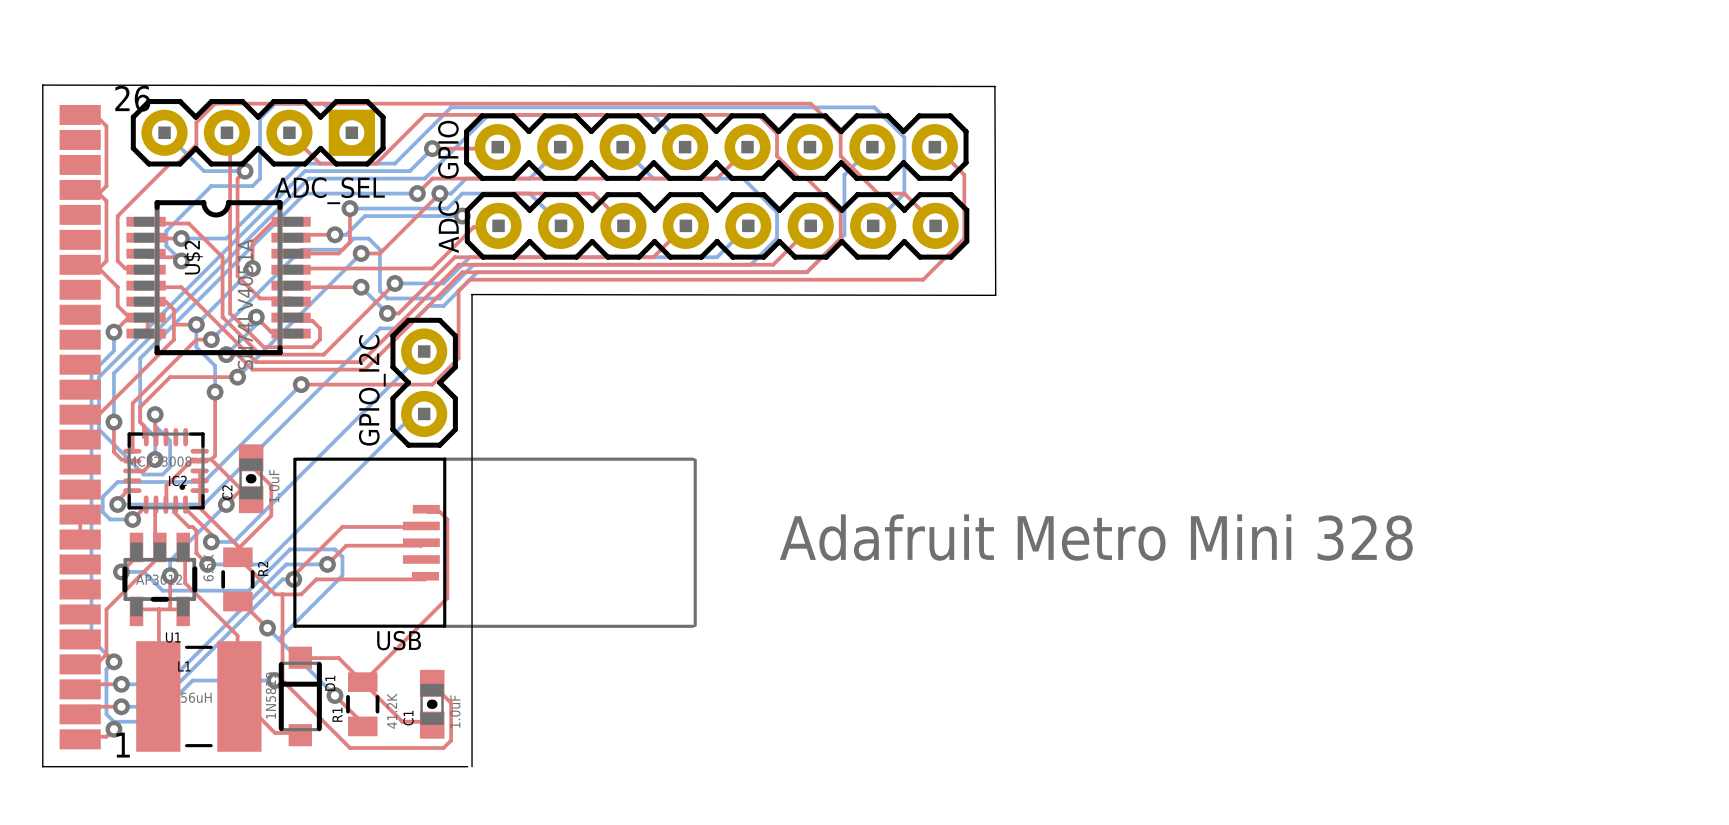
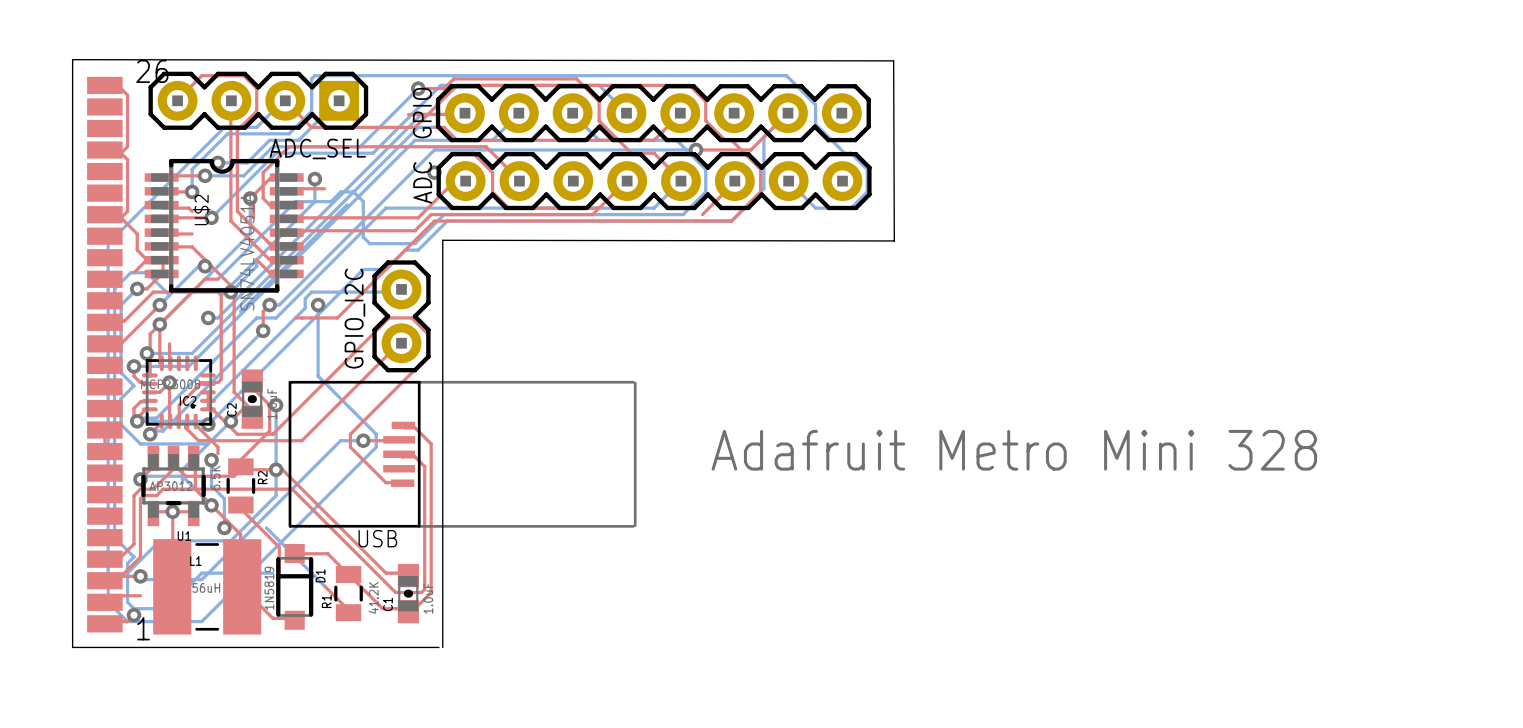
top track: (215, 103) (196, 122) (196, 144) (177, 163) (170, 163) (117, 216) (117, 260) (125, 268) (146, 269) -> (221, 75) (201, 75) (177, 100)
top track: (241, 103) (810, 103) (840, 133) (840, 156) (878, 193) (904, 193) (935, 225) -> none
bottom track: (874, 107) (451, 107) (394, 163) (301, 163) -> (789, 78) (786, 75) (314, 75) (311, 78) (311, 111) (295, 127)
top track: (488, 114) (424, 114) (376, 163) -> (457, 85) (415, 127) (360, 127)
bottom track: (488, 114) (424, 178) (308, 178) (113, 373) (113, 422) -> none
top track: none -> (418, 88) (444, 88) (453, 78) (576, 78) (599, 101) (599, 120) (631, 153) (654, 153) (680, 181)
bottom track: none -> (418, 88) (360, 146) (272, 146) (243, 175) (205, 175)
bottom track: (164, 132) (203, 171) (222, 171) -> (192, 188) (192, 169) (227, 133)
top track: (226, 132) (230, 133) (230, 313) (263, 347) (312, 347) (319, 339) (319, 328) (312, 320) (293, 320) (291, 317) -> (231, 100) (230, 221) (269, 259) (286, 260)
bottom track: none -> (285, 100) (256, 127) (224, 127) (108, 243) (108, 602) (127, 621) (201, 621) (376, 447) (376, 434) (318, 376) (318, 305)
bottom track: (351, 132) (323, 103) (275, 103) (260, 118) (260, 178) (252, 186) (211, 186) (166, 231) (166, 246) (181, 260) -> (339, 100) (298, 140) (269, 140) (247, 162) (217, 162)
bottom track: none -> (464, 113) (421, 114) (217, 317) (208, 317)
top track: none -> (787, 113) (750, 149) (696, 149)
top track: (934, 147) (964, 174) (964, 238) (923, 279) (469, 279) (458, 290) (458, 358) (432, 384) -> (402, 483) (385, 482) (350, 447) (350, 434) (427, 356) (427, 334) (411, 317) (408, 317)
bottom track: (432, 148) (409, 171) (305, 171) (98, 377) -> (137, 288) (121, 305) (121, 311)
via position: (432, 148) -> (418, 88)
bottom track: (904, 159) (904, 193) (873, 225) -> (815, 124) (844, 153) (851, 153) (867, 169) (867, 191) (851, 208) (815, 208) (788, 181)
bottom track: none -> (434, 127) (418, 127) (192, 353) (146, 353)
top track: (245, 171) (237, 178) (237, 275) (260, 298) (271, 298) -> (243, 75) (256, 88) (256, 111) (237, 130) (237, 211) (269, 243)
via: (245, 171) -> none
bottom track: (293, 171) (226, 238) (181, 238) -> (289, 133) (247, 133)
bottom track: (466, 178) (451, 193) (439, 193) -> (437, 140) (415, 140) (188, 366) (133, 366)
top track: (488, 178) (432, 178) (417, 193) -> (457, 140) (444, 127) (434, 127)
bottom track: none -> (696, 149) (434, 149) (279, 305) (269, 305)
via: none -> (696, 149)
bottom track: (305, 193) (140, 358) (140, 422) (155, 437) (155, 459) -> (298, 153) (276, 153) (211, 217)
bottom track: (391, 193) (417, 193) -> (373, 153) (440, 85) (457, 85)
via: (417, 193) -> none
top track: (439, 193) (379, 253) (361, 253) -> none
via: (439, 193) -> none
top track: (507, 193) (593, 193) (623, 223) (623, 225) -> (473, 153) (492, 172) (492, 191) (508, 208)
via: none -> (217, 162)
top track: (349, 208) (349, 242) (338, 253) (291, 253) -> (519, 181) (486, 146) (289, 146) (263, 172) (263, 198) (269, 204) (286, 205)
bottom track: (349, 208) (447, 208) (462, 193) (529, 193) (560, 225) -> none
via: (349, 208) -> none
bottom track: (462, 216) (364, 216) (346, 234) (334, 234) -> none
via: none -> (205, 175)
top track: (146, 221) (147, 223) (188, 223) (222, 257) (222, 317) (260, 354) (323, 354) (394, 283) -> (161, 177) (163, 175) (205, 175)
bottom track: none -> (314, 179) (314, 201) (221, 295)
top track: (484, 227) (473, 227) (432, 268) -> (453, 182) (427, 208)
via position: (334, 234) -> (314, 179)
bottom track: none -> (250, 198) (250, 233) (159, 324)
via: (361, 253) -> none
top track: (454, 257) (548, 257) -> none
bottom track: (469, 257) (443, 283) (394, 283) -> (440, 208) (385, 208) (276, 317) (256, 317) (156, 418) (133, 418)
via: (181, 260) -> none
top track: (645, 264) (773, 264) -> (592, 214) (599, 208)
top track: none -> (211, 217) (161, 218)
via: none -> (211, 217)
bottom track: (252, 268) (196, 324) (196, 347) (215, 365) (215, 392) -> none
via position: (252, 268) -> (250, 198)
top track: (443, 268) (398, 313) (387, 313) -> (418, 217) (408, 217)
via: (394, 283) -> none
top track: (439, 283) (361, 362) (256, 362) (181, 287) -> none
top track: (291, 285) (361, 287) -> (286, 232) (289, 230) (415, 230)
bottom track: (361, 287) (387, 313) -> none
via: (361, 287) -> none
top track: (166, 302) (173, 309) (173, 339) (143, 369) -> none
via: (387, 313) -> none
bottom track: none -> (205, 259) (159, 305)
via: (256, 317) -> none
top track: (173, 324) (196, 324) -> none
bottom track: (113, 332) (113, 350) (91, 373) -> (169, 295) (146, 272) (130, 272) (114, 288) (114, 308)
via position: (113, 332) -> (137, 288)
top track: none -> (161, 273) (146, 288) (137, 288)
via: (211, 339) -> none
top track: (226, 354) (237, 354) (252, 369) (364, 369) -> none
bottom track: (421, 354) (233, 541) (211, 541) -> (398, 292) (311, 292) (305, 298) (305, 308) (295, 317)
via: none -> (159, 305)
top track: none -> (269, 305) (263, 311) (263, 330)
via: none -> (269, 305)
via: none -> (318, 305)
top track: (237, 377) (170, 377) (140, 407) (140, 422) (143, 425) -> (159, 324) (159, 353)
via: (237, 377) -> none
via: (301, 384) -> none
top track: (349, 384) (409, 384) -> (337, 317) (350, 305)
top track: none -> (389, 317) (272, 434) (237, 434) (211, 408) (208, 408)
top track: none -> (104, 322) (124, 321) (153, 292) (217, 292) (221, 295) (221, 324)
via: none -> (159, 324)
via position: (215, 392) -> (208, 317)
bottom track: none -> (263, 330) (163, 431) (146, 431)
via: none -> (263, 330)
bottom track: (424, 413) (413, 414) (263, 564) (207, 564) -> none
bottom track: (155, 414) (155, 425) (170, 440) (170, 467) (162, 474) (143, 474) (98, 429) -> (124, 427) (121, 424) (121, 398) (133, 385) (121, 372) (121, 356)
via: (155, 414) -> none
top track: (113, 422) (113, 440) -> none
via position: (113, 422) -> (146, 353)
via: none -> (133, 366)
top track: (211, 459) (248, 496) -> (179, 246) (192, 246) (234, 288) (234, 392) (250, 408) (250, 414)
top track: none -> (149, 400) (140, 401) (133, 408) (133, 418)
bottom track: (203, 482) (117, 482) (102, 496) (102, 511) -> none
bottom track: none -> (276, 405) (276, 495) (230, 540) (159, 540) (127, 573)
via: none -> (276, 405)
top track: (200, 489) (200, 508) (237, 545) (237, 556) -> (127, 550) (133, 544) (133, 495) (140, 489) (153, 489) (175, 466) (185, 476) (234, 476) (240, 466)
top track: (156, 504) (155, 541) (159, 547) (158, 556) (125, 590) -> (170, 421) (169, 385)
via: none -> (208, 424)
bottom track: (110, 519) (132, 519) -> (130, 434) (140, 443) (208, 443)
top track: (447, 519) (447, 598) (362, 682) -> (421, 434) (431, 443) (431, 592) (415, 608) (408, 608) (408, 611)
top track: (192, 526) (196, 530) (196, 553) (207, 564) -> (201, 440) (301, 440) (401, 343)
top track: (379, 526) (342, 526) (293, 575) (293, 579) -> none
bottom track: none -> (363, 440) (340, 440) (201, 579) (140, 579)
via: none -> (363, 440)
via: (211, 541) -> none
top track: (421, 542) (421, 545) (346, 545) (327, 564) -> (399, 454) (402, 456) (415, 456) (424, 466) (424, 589) (421, 592) (395, 592) (292, 489) (163, 489) (156, 495) (143, 495)
bottom track: none -> (211, 460) (211, 485) (224, 498) (224, 527)
via: none -> (211, 460)
top track: (241, 560) (275, 594) (301, 594) (316, 579) (424, 579) (425, 576) -> (243, 469) (282, 469) (385, 573) (405, 573) (408, 575)
via: (207, 564) -> none
bottom track: (327, 564) (286, 564) (166, 684) (121, 684) -> none
via: (327, 564) -> none
bottom track: none -> (137, 476) (182, 476) (211, 505)
bottom track: (121, 571) (143, 571) (162, 590) (248, 590) (290, 549) (334, 549) (342, 556) (342, 575) (278, 639) -> none
top track: (170, 575) (170, 609) -> none
via: (170, 575) -> none
bottom track: (293, 579) (282, 579) (155, 706) (121, 706) -> none
via position: (293, 579) -> (276, 469)
top track: (121, 594) (106, 609) (106, 654) (113, 661) -> (140, 498) (140, 557) (117, 579) (104, 579)
top track: (282, 594) (282, 650) -> none
via: none -> (211, 505)
top track: (241, 601) (267, 628) -> (243, 505) (243, 511) (279, 547)
via: none -> (172, 511)
via: none -> (224, 527)
via: (267, 628) -> none
via: (113, 661) -> none
top track: (275, 680) (282, 680) (349, 747) (443, 747) (451, 740) (451, 703) (432, 683) -> none
via: (275, 680) -> none
via: (334, 695) -> none
via: (121, 706) -> none

